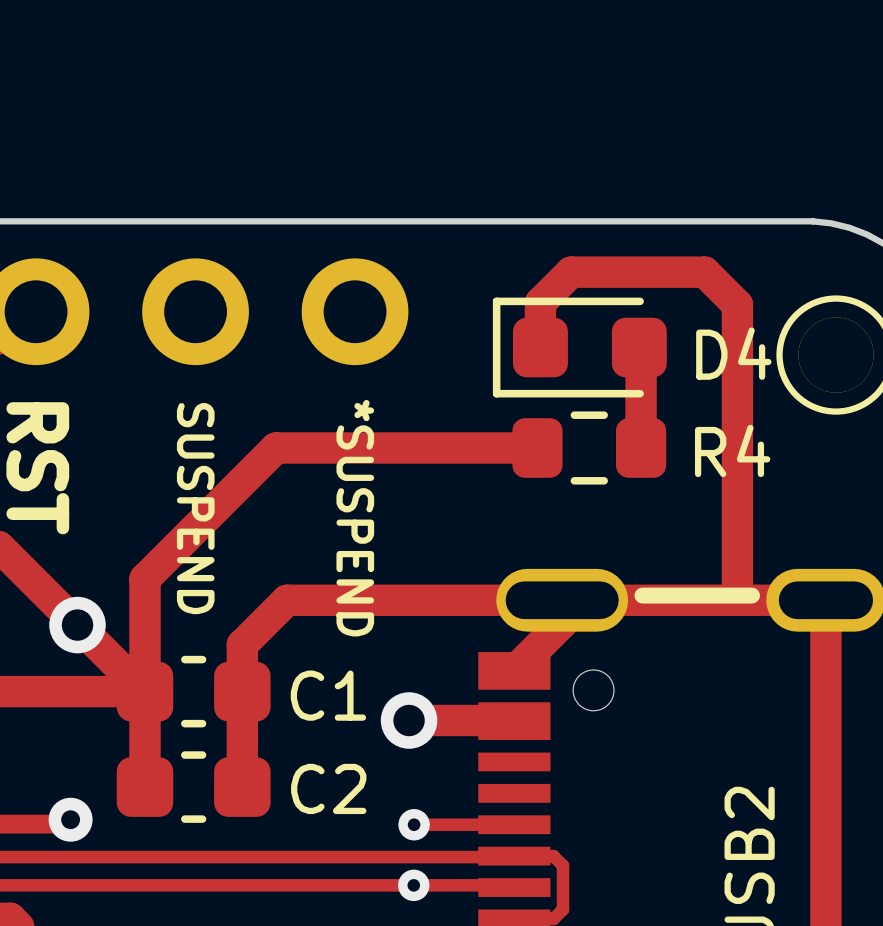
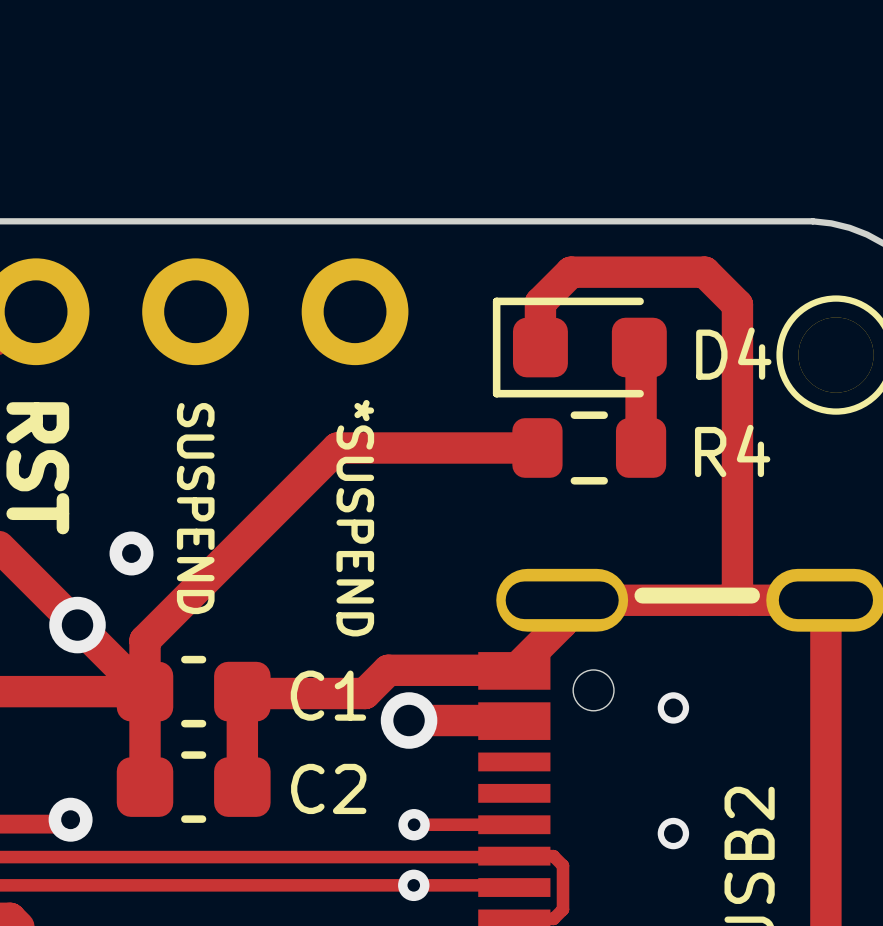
track: (337, 447) (275, 447) (145, 578) (145, 640) -> (337, 447) (145, 640)
via: none -> (131, 553)
track: (562, 600) (286, 600) (242, 644) (242, 691) -> (513, 670) (388, 670) (365, 693) (244, 693) (242, 691)
via: none -> (673, 707)
via: none -> (673, 833)

